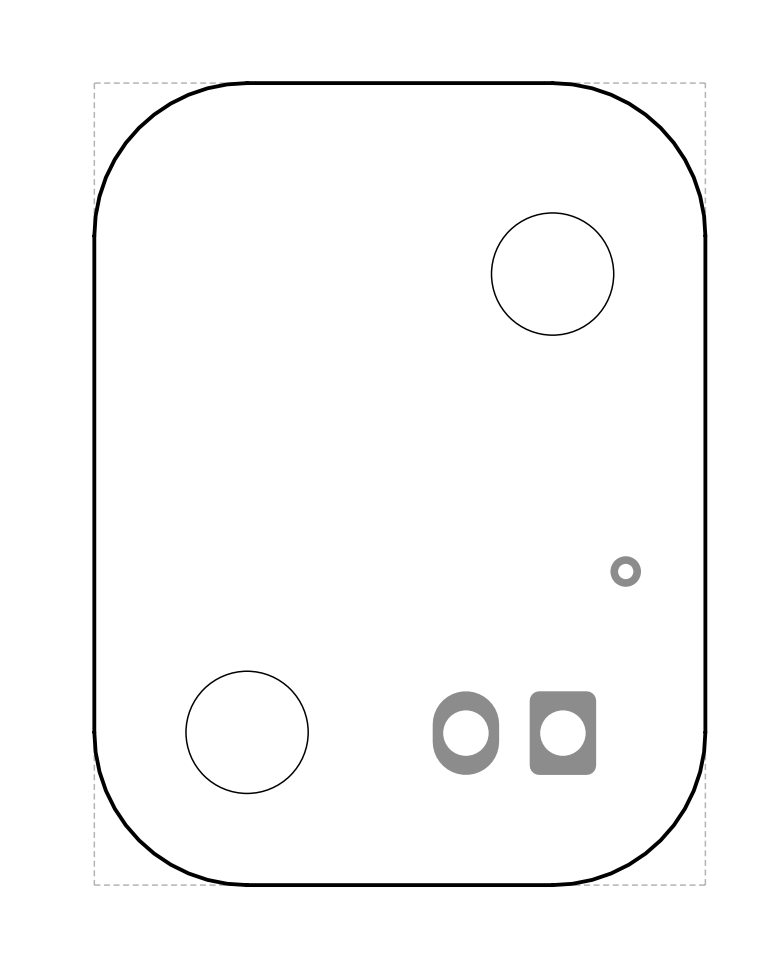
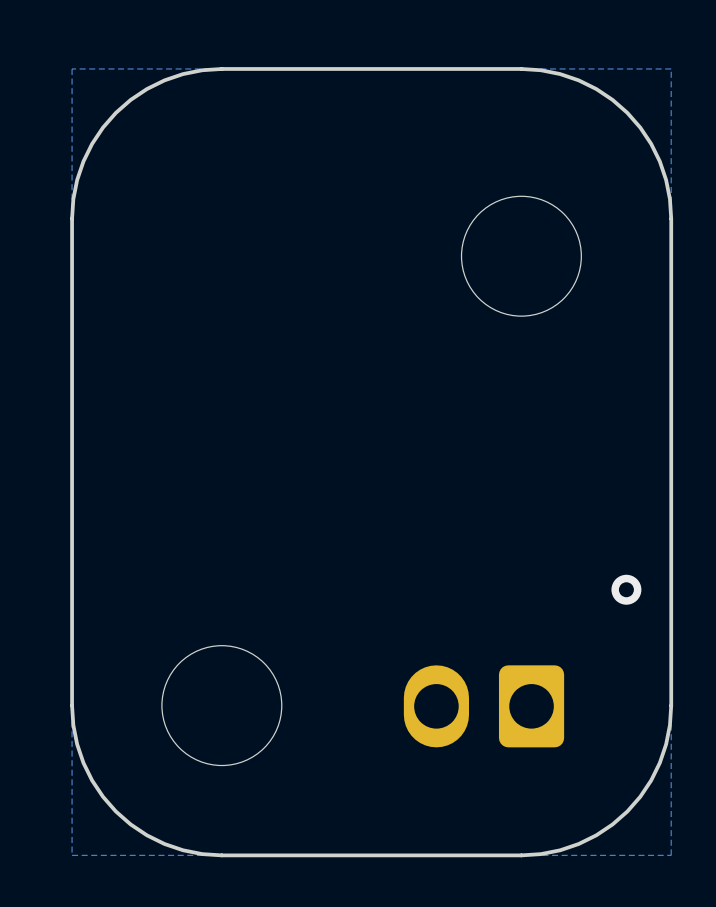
via position: (625, 571) -> (626, 589)

